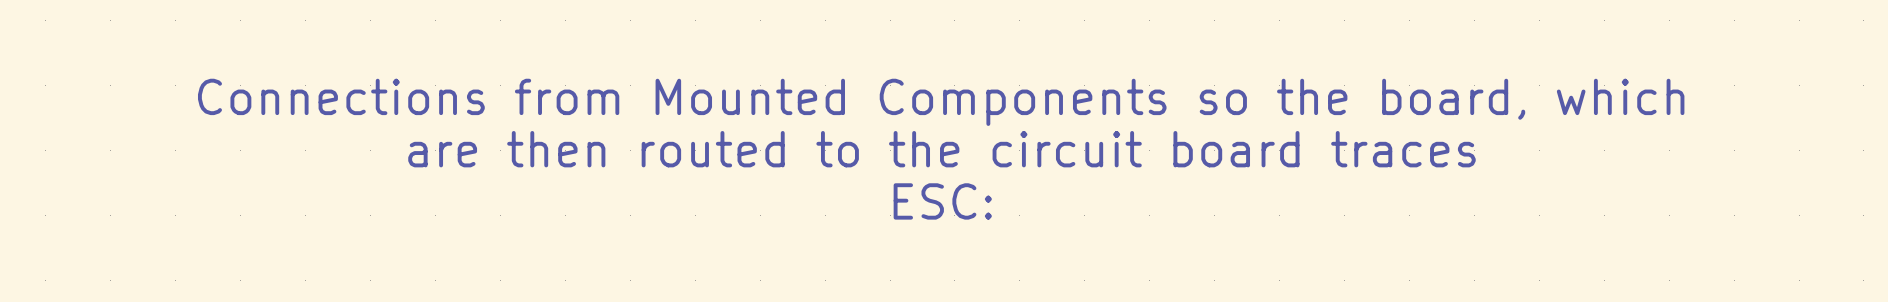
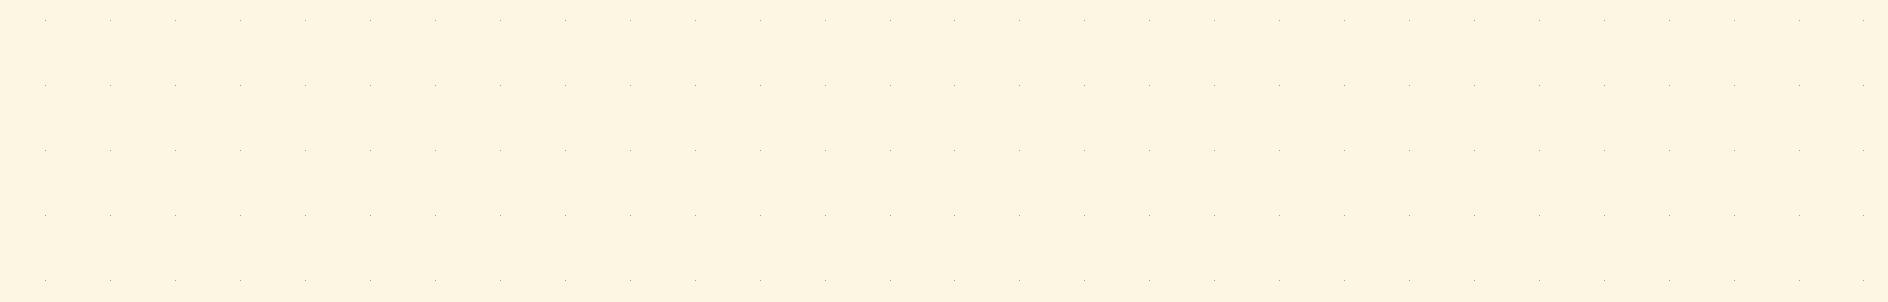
text: Connections from Mounted Components so the board, which (941, 102) -> none
text: are then routed to the circuit board traces (941, 149) -> none
text: ESC: (942, 201) -> none

